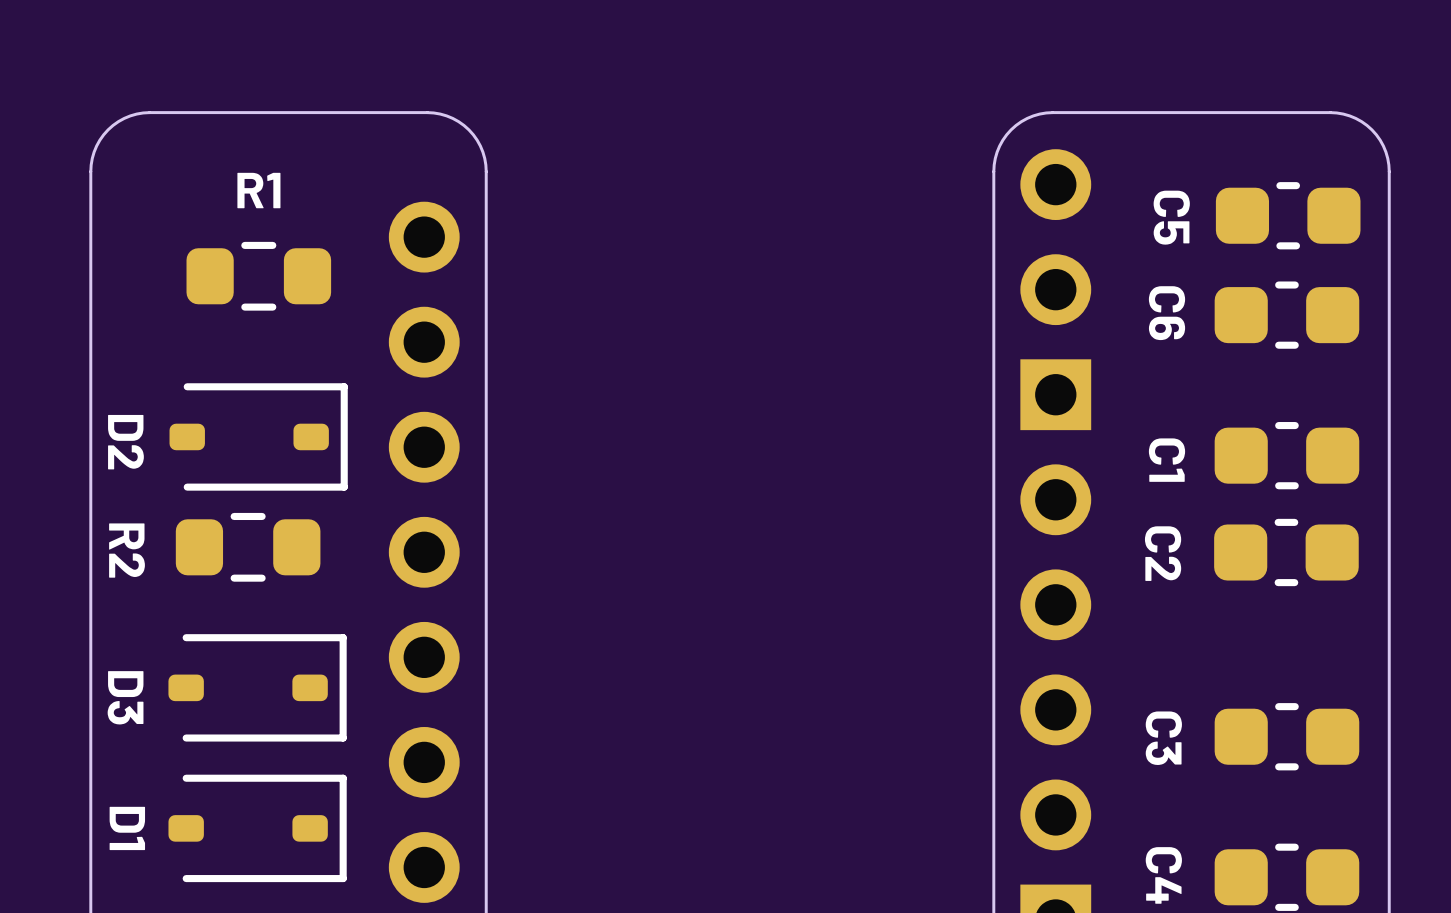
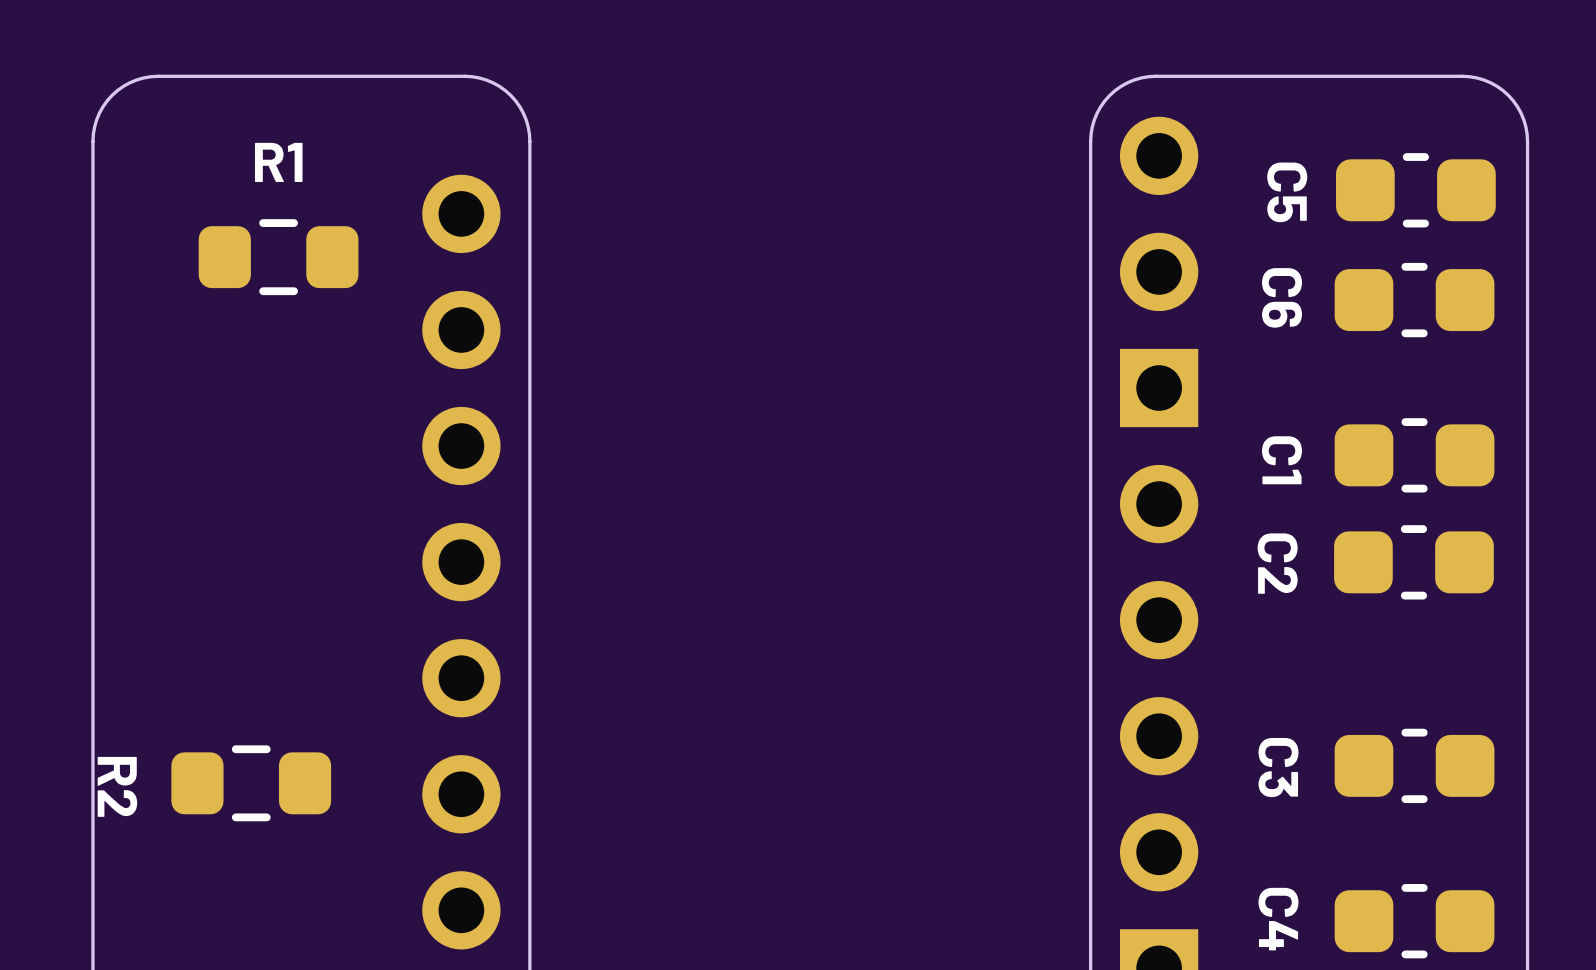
D2: (258, 436) -> none
R2 position: (248, 547) -> (251, 783)
D3: (257, 687) -> none
D1: (257, 828) -> none

